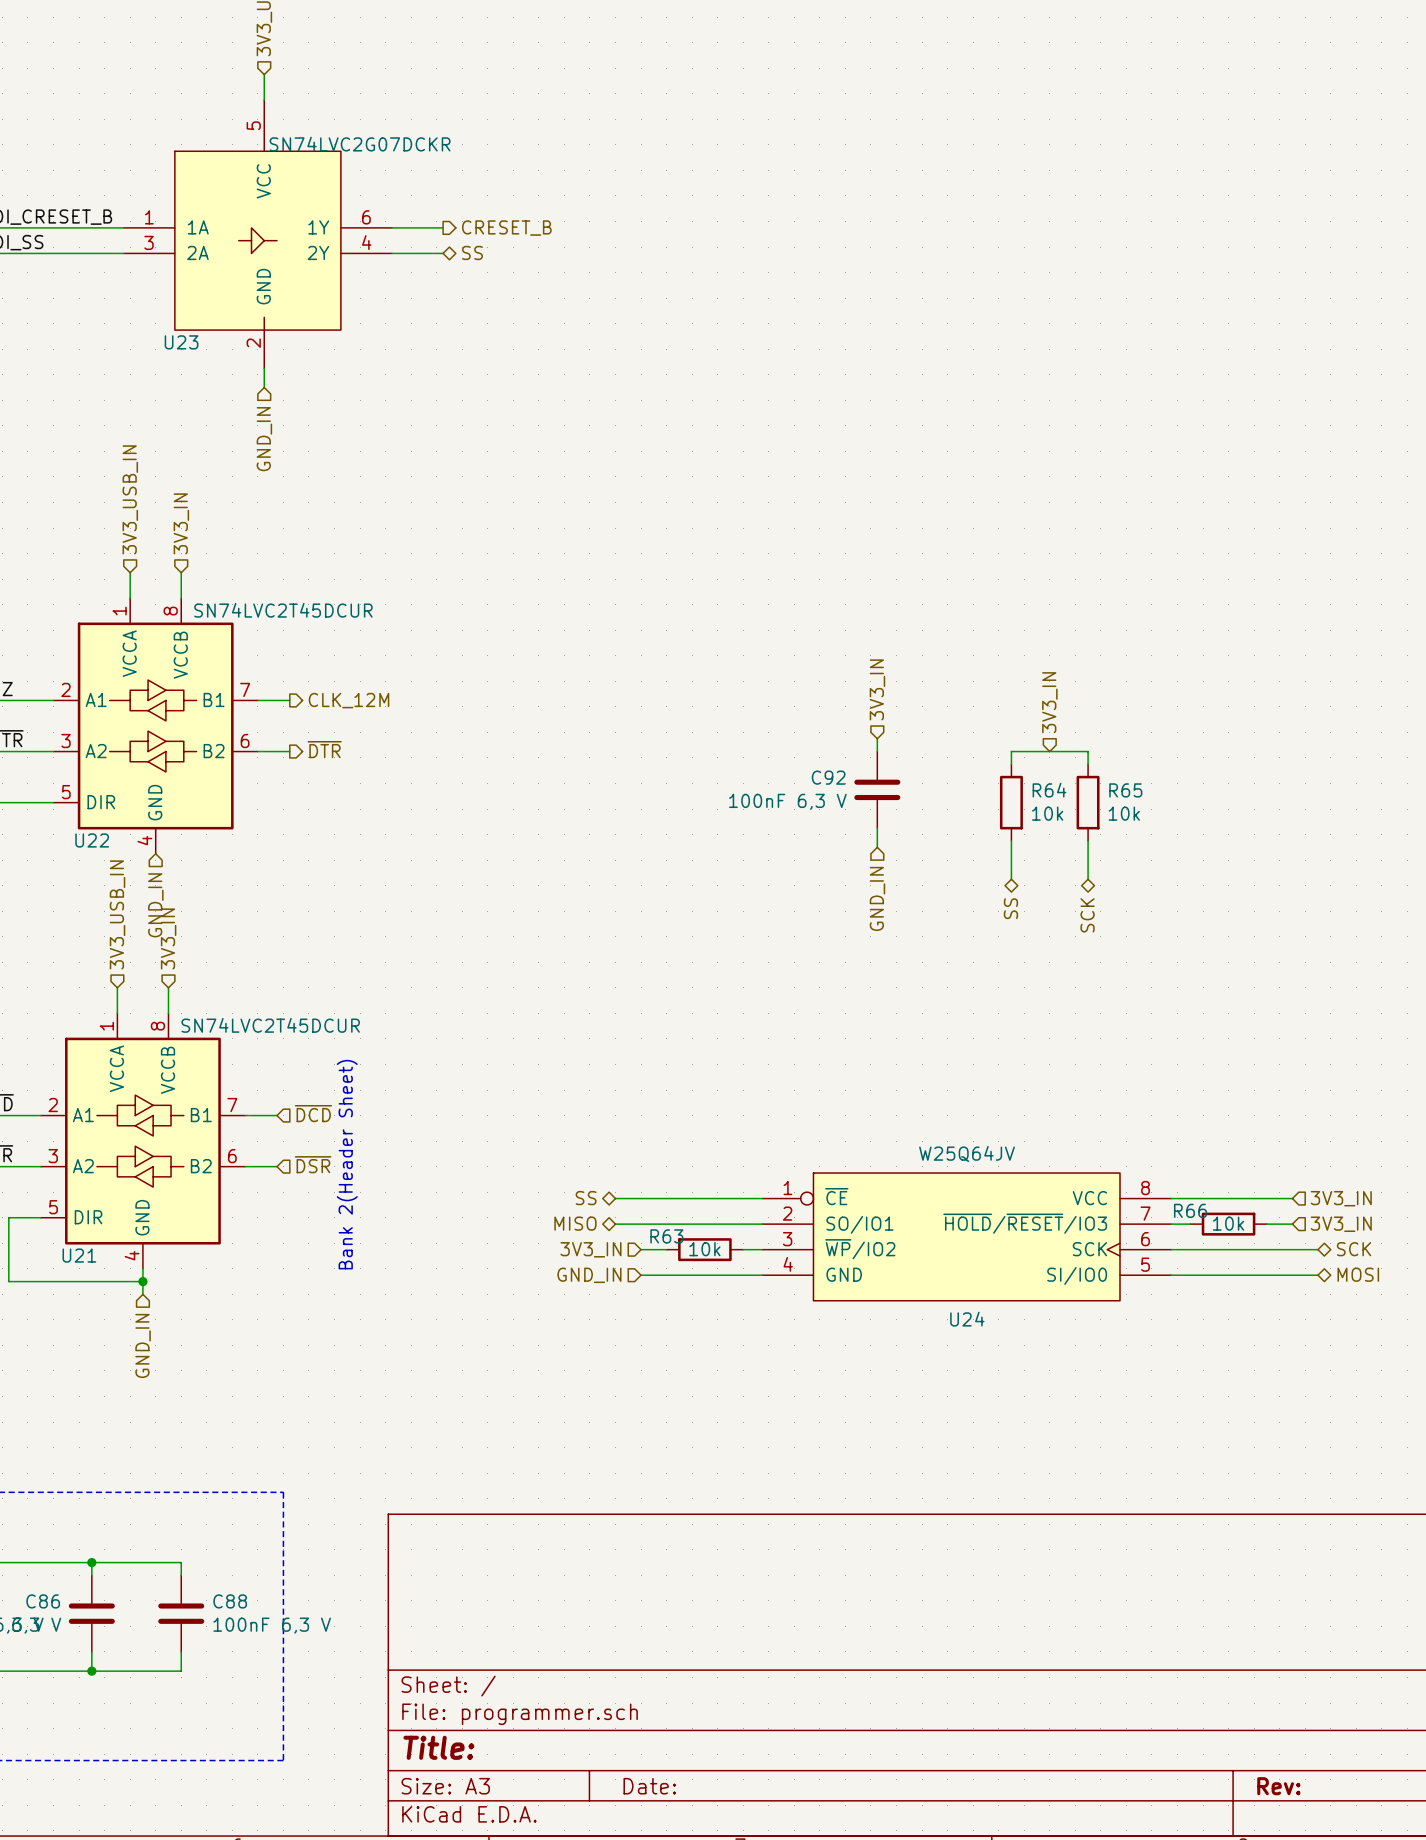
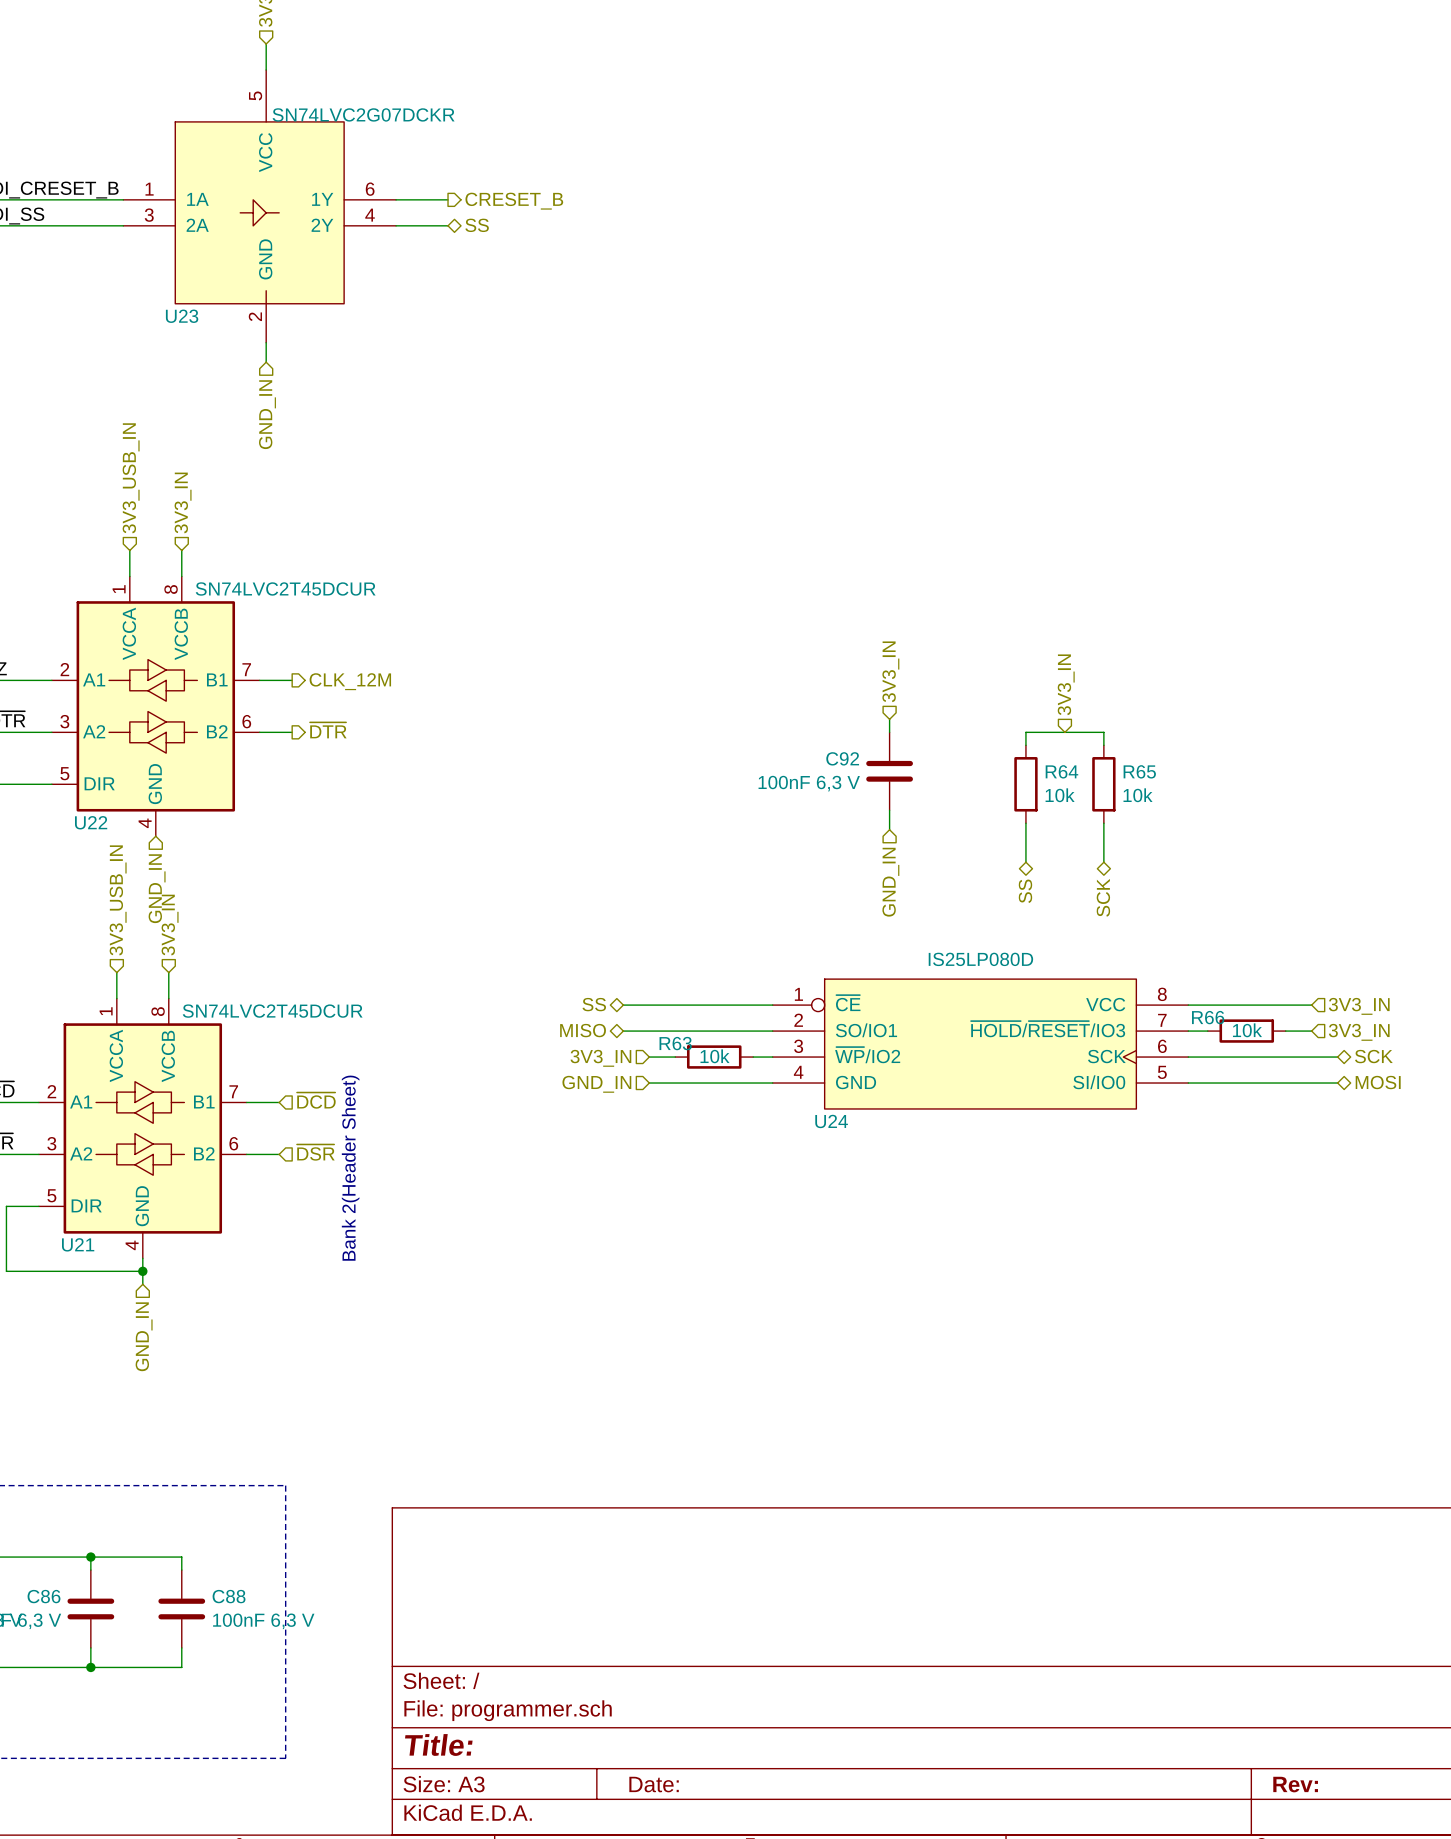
hierarchical label: none -> 3V3_IN (1359, 1006)
hierarchical label: none -> 3V3_IN (1359, 1032)
U24 value: W25Q64JV (967, 1153) -> IS25LP080D (980, 959)
hierarchical label position: SS (586, 1198) -> SS (594, 1004)
wire: (615, 1198) (762, 1198) -> (623, 1005) (772, 1005)
wire: (1171, 1198) (1292, 1198) -> (1188, 1005) (1311, 1005)
hierarchical label: 3V3_IN (1341, 1198) -> none
hierarchical label position: MISO (575, 1223) -> MISO (583, 1030)
wire: (615, 1224) (762, 1224) -> (623, 1031) (772, 1031)
wire: (1171, 1224) (1190, 1224) -> (1188, 1031) (1207, 1031)
R66 position: (1228, 1224) -> (1246, 1031)
wire: (1266, 1224) (1292, 1224) -> (1285, 1031) (1311, 1031)
hierarchical label: 3V3_IN (1341, 1224) -> none
U24 position: (966, 1236) -> (980, 1044)
hierarchical label position: 3V3_IN (590, 1249) -> 3V3_IN (600, 1058)
wire: (641, 1249) (666, 1249) -> (649, 1057) (675, 1057)
R63 position: (704, 1249) -> (714, 1057)
wire: (743, 1249) (762, 1249) -> (753, 1057) (772, 1057)
wire: (1171, 1249) (1317, 1249) -> (1188, 1057) (1337, 1057)
hierarchical label position: SCK (1354, 1249) -> SCK (1373, 1056)
hierarchical label position: MOSI (1358, 1274) -> MOSI (1378, 1082)
hierarchical label position: GND_IN (589, 1275) -> GND_IN (596, 1084)
wire: (641, 1275) (762, 1275) -> (649, 1083) (772, 1083)
wire: (1171, 1275) (1317, 1275) -> (1188, 1083) (1337, 1083)
U24 name position: U24 (967, 1319) -> U24 (831, 1121)

